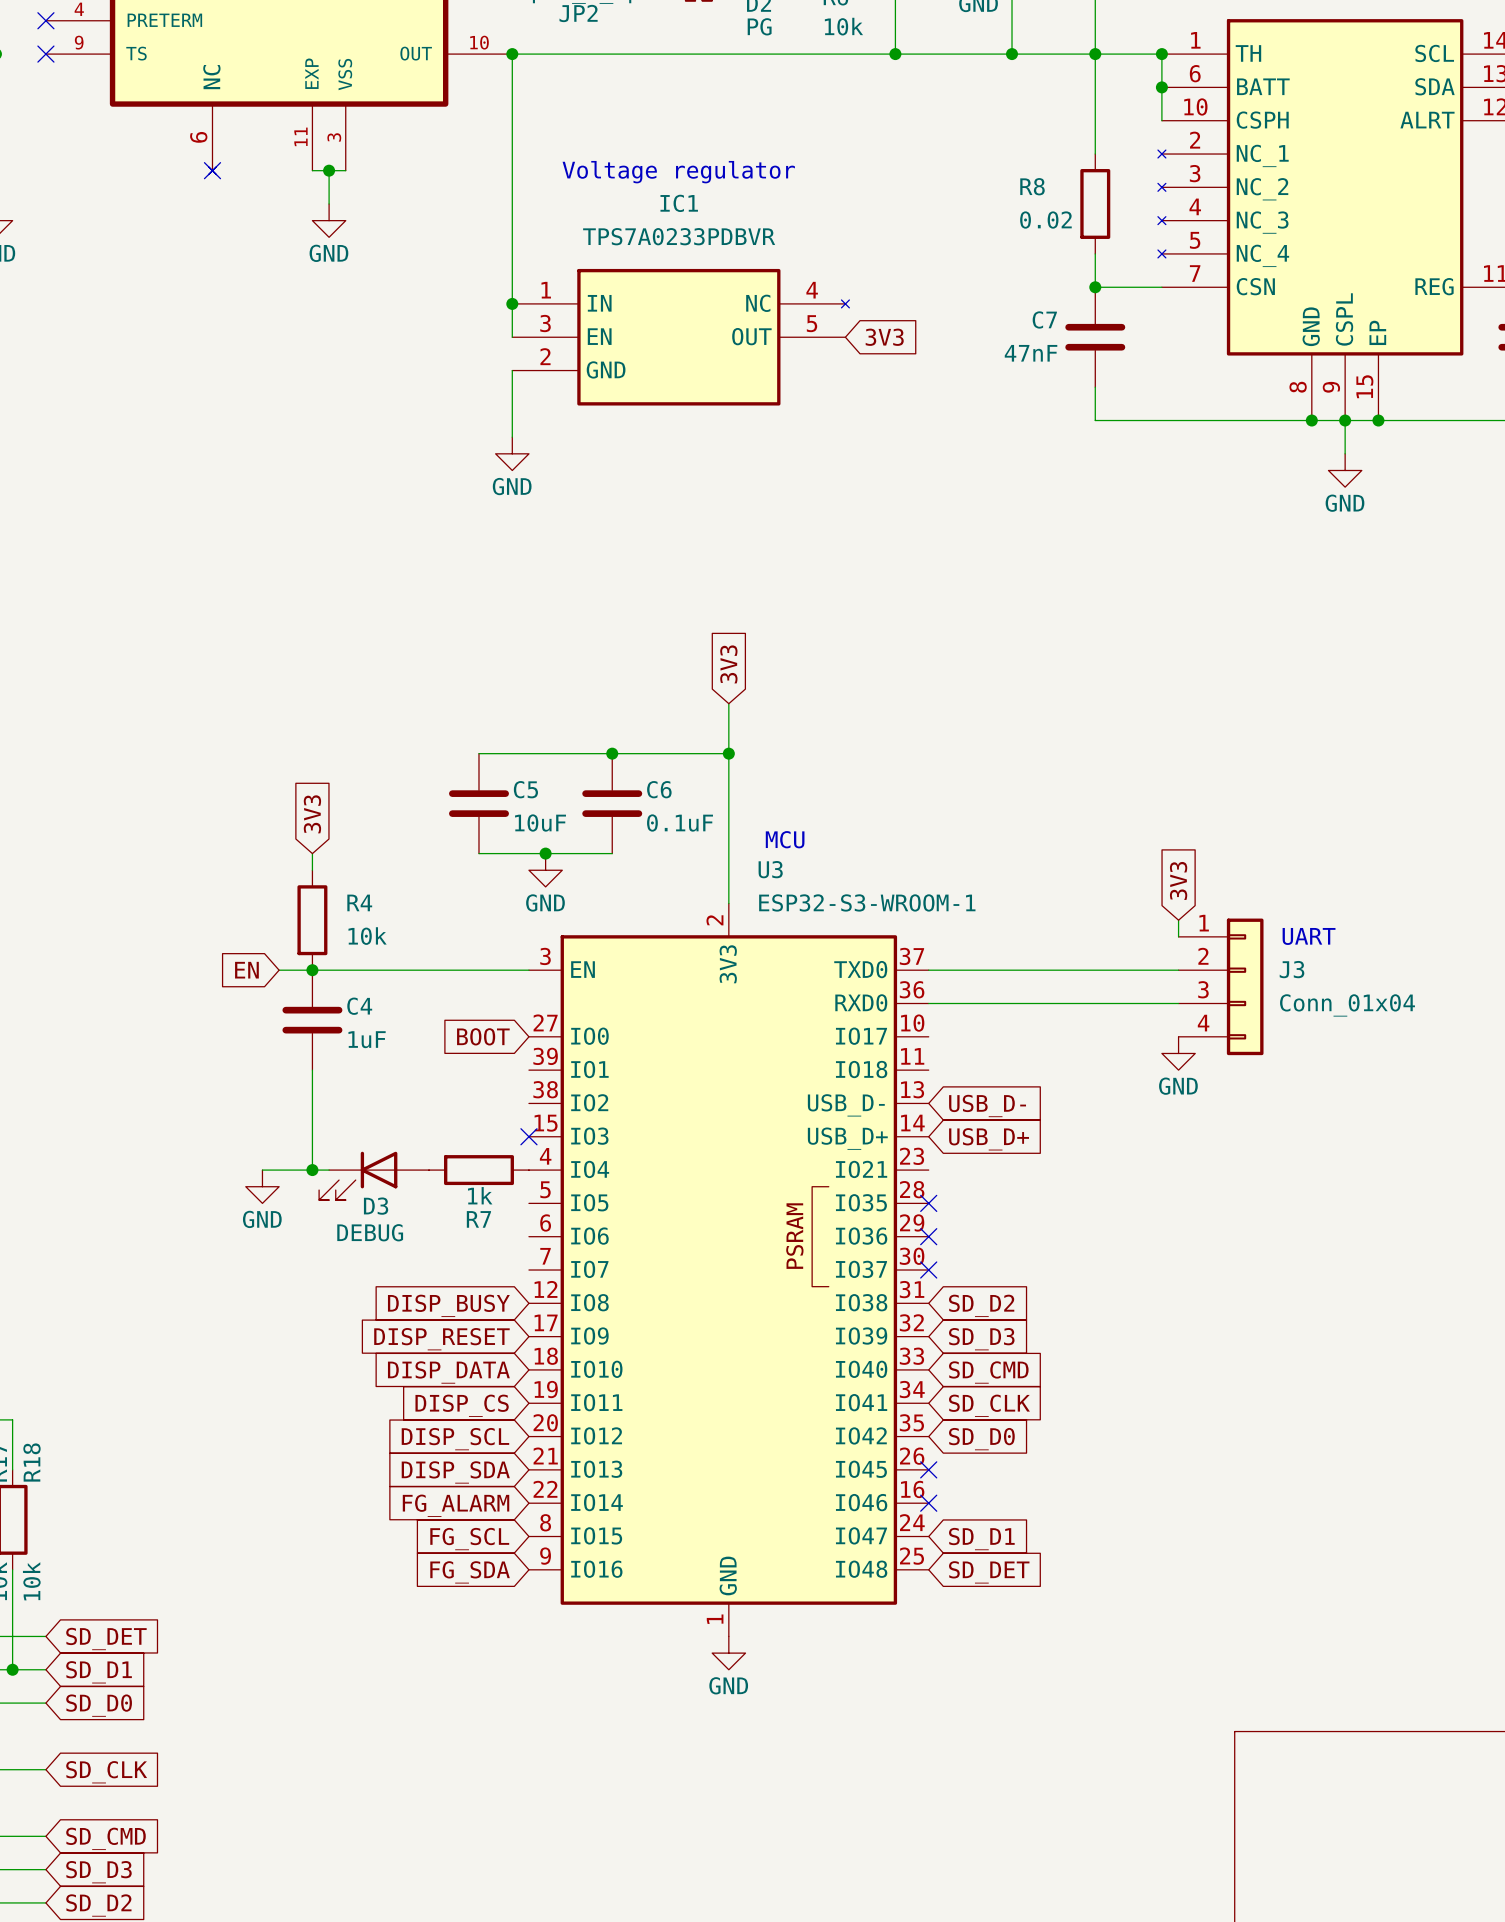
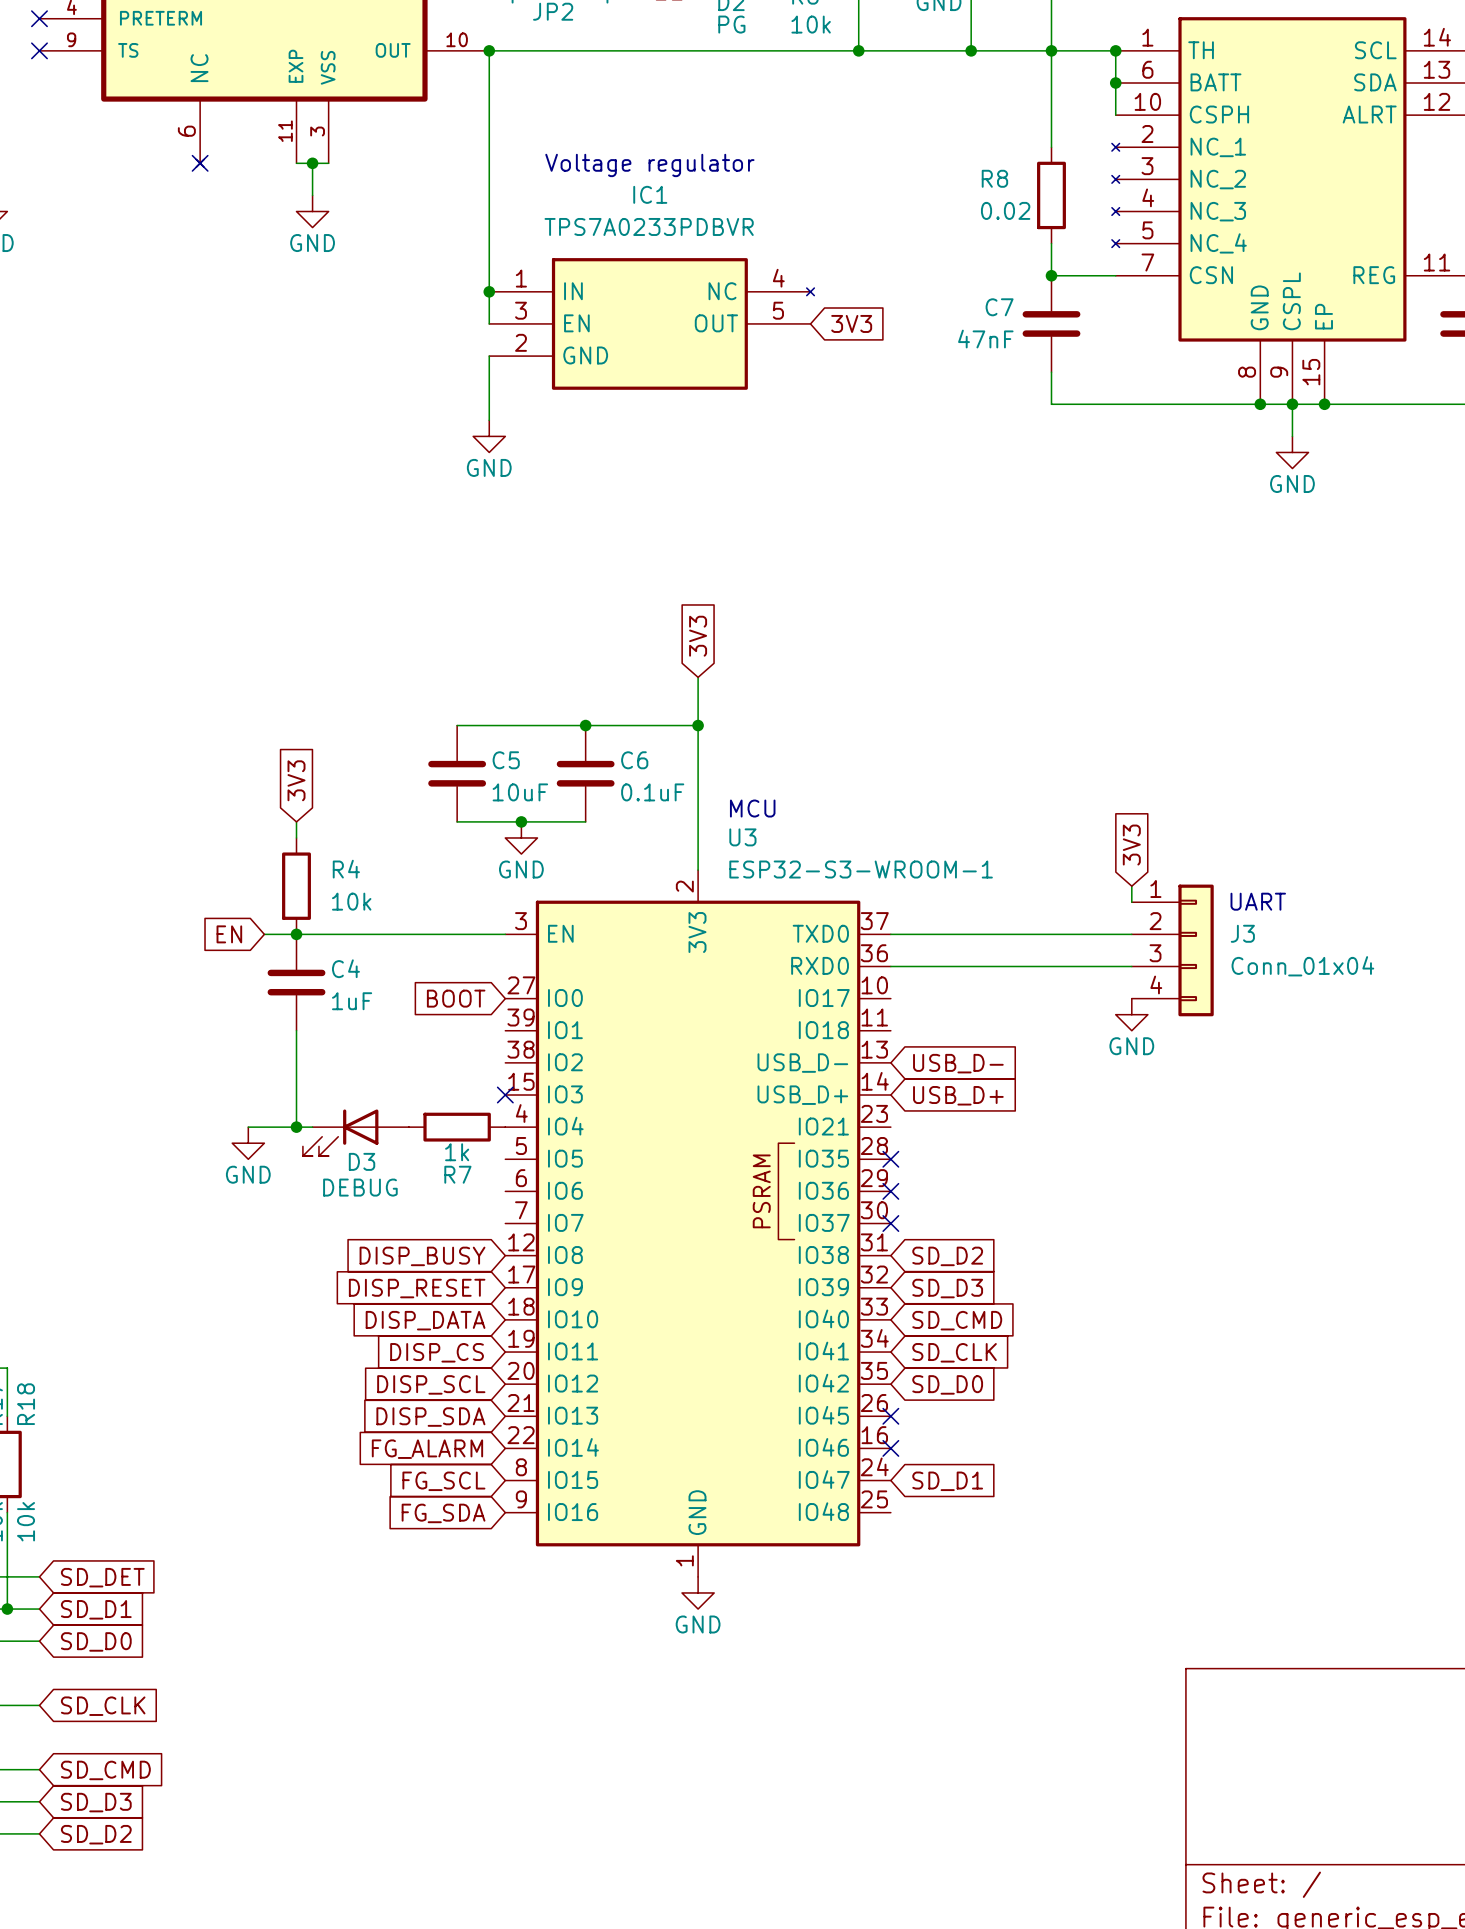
global label: SD_DET (989, 1572) -> none

